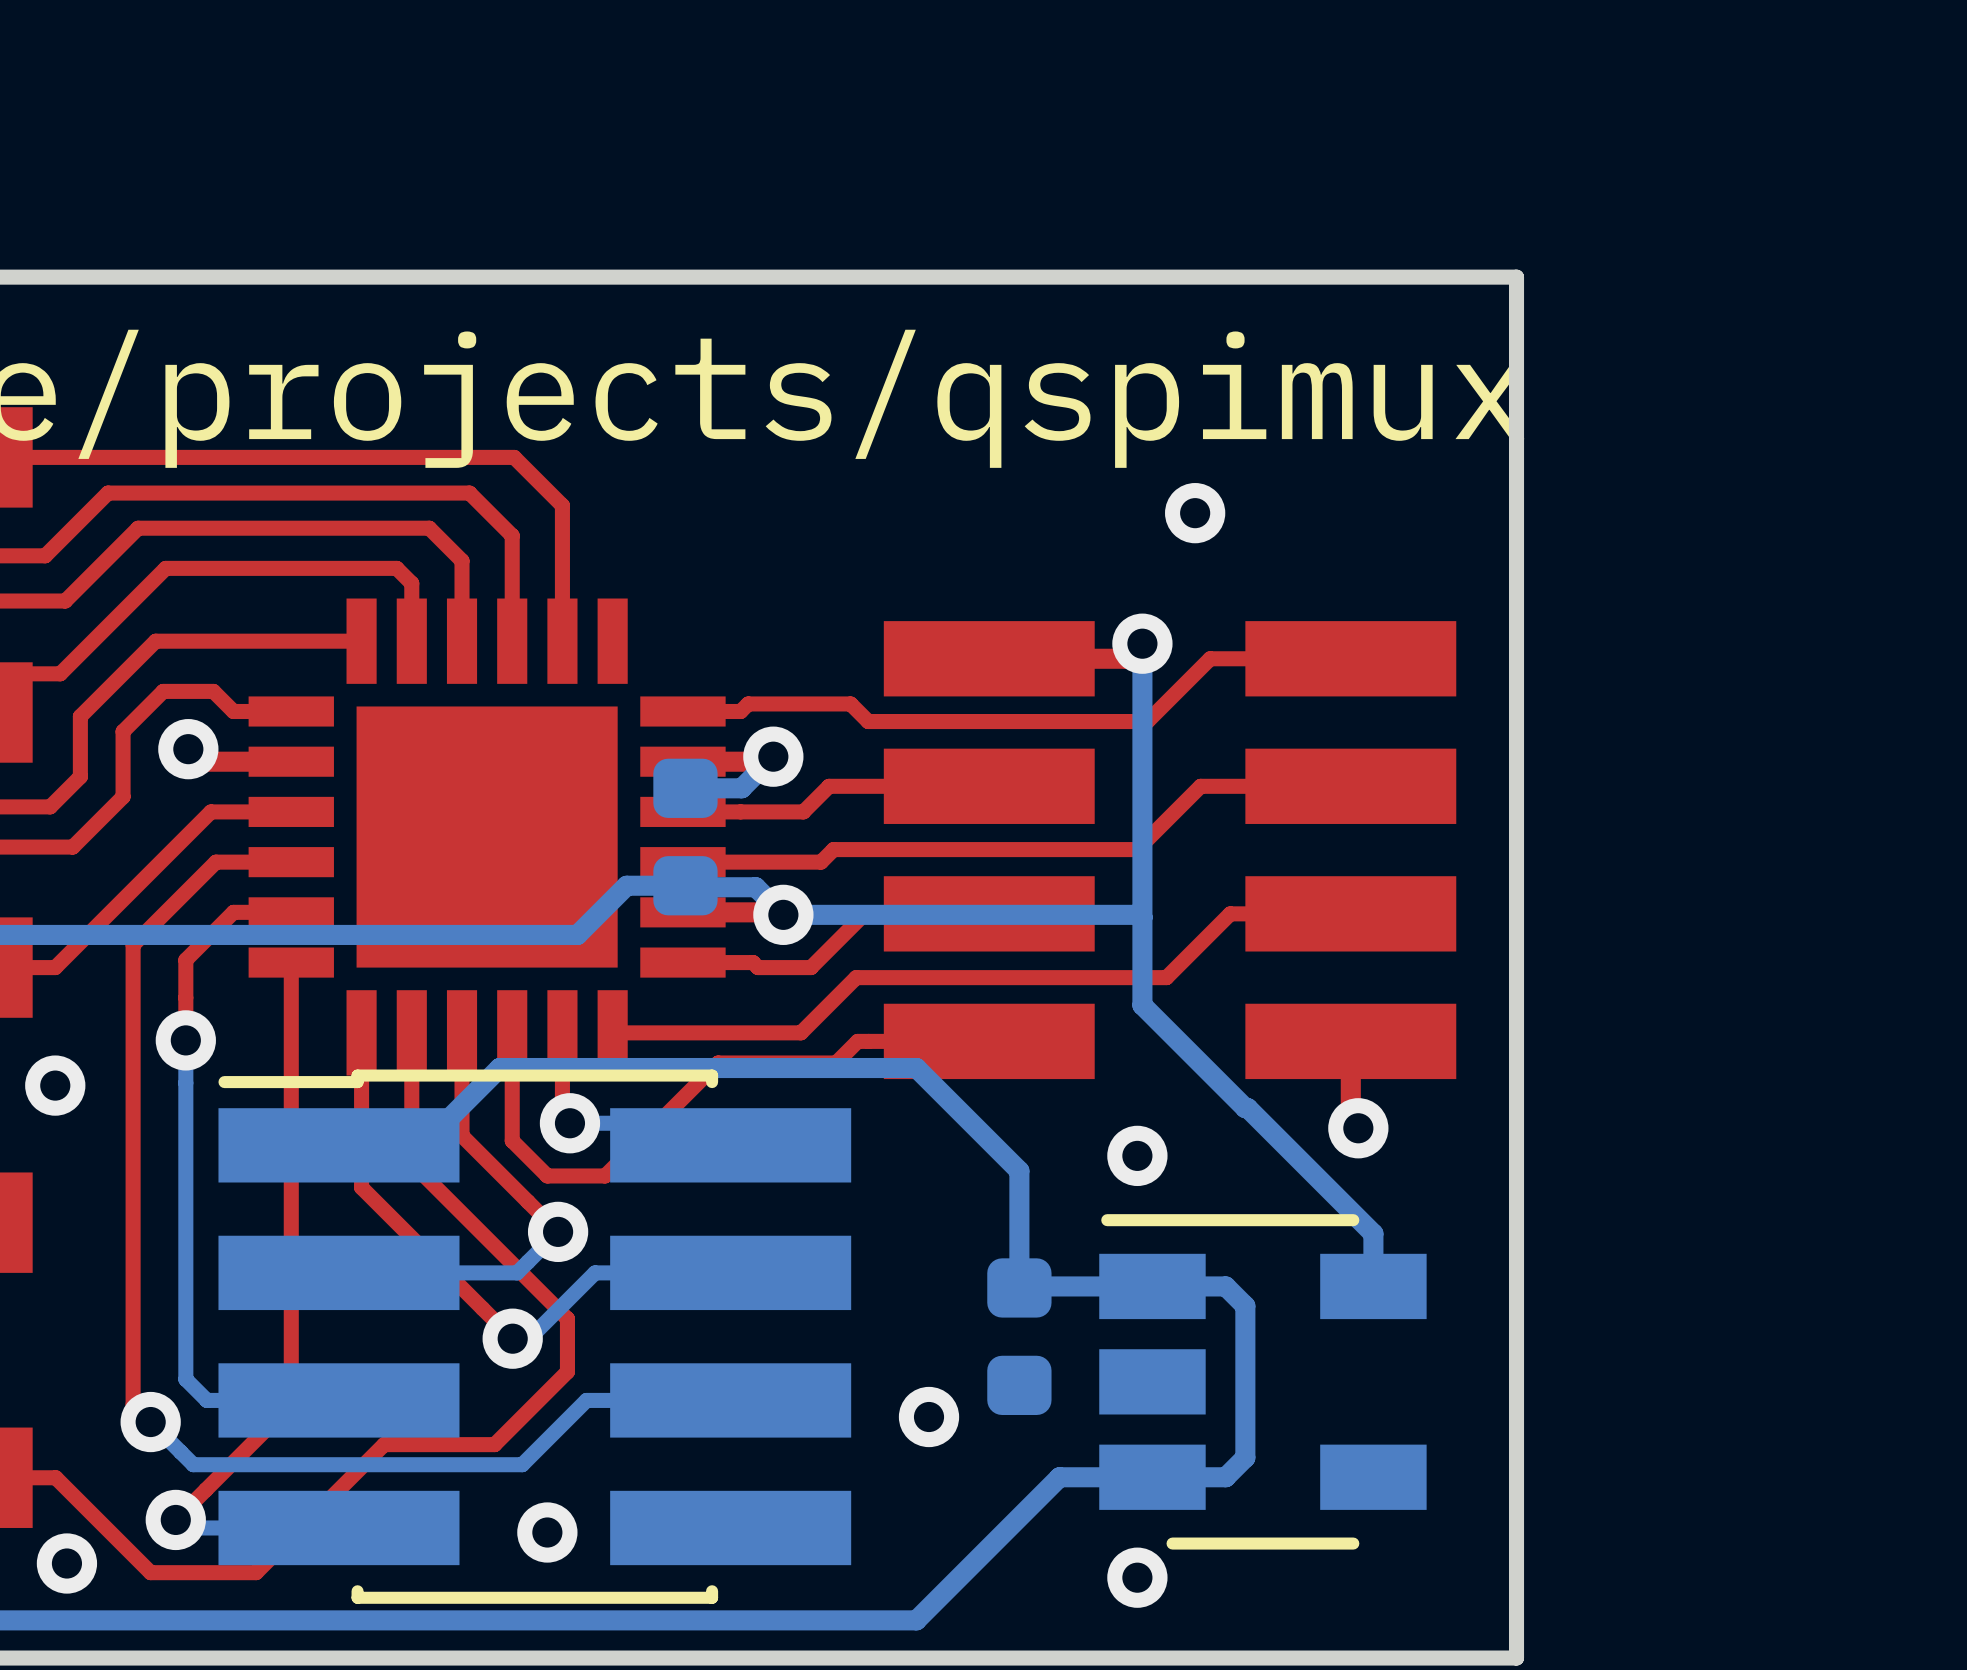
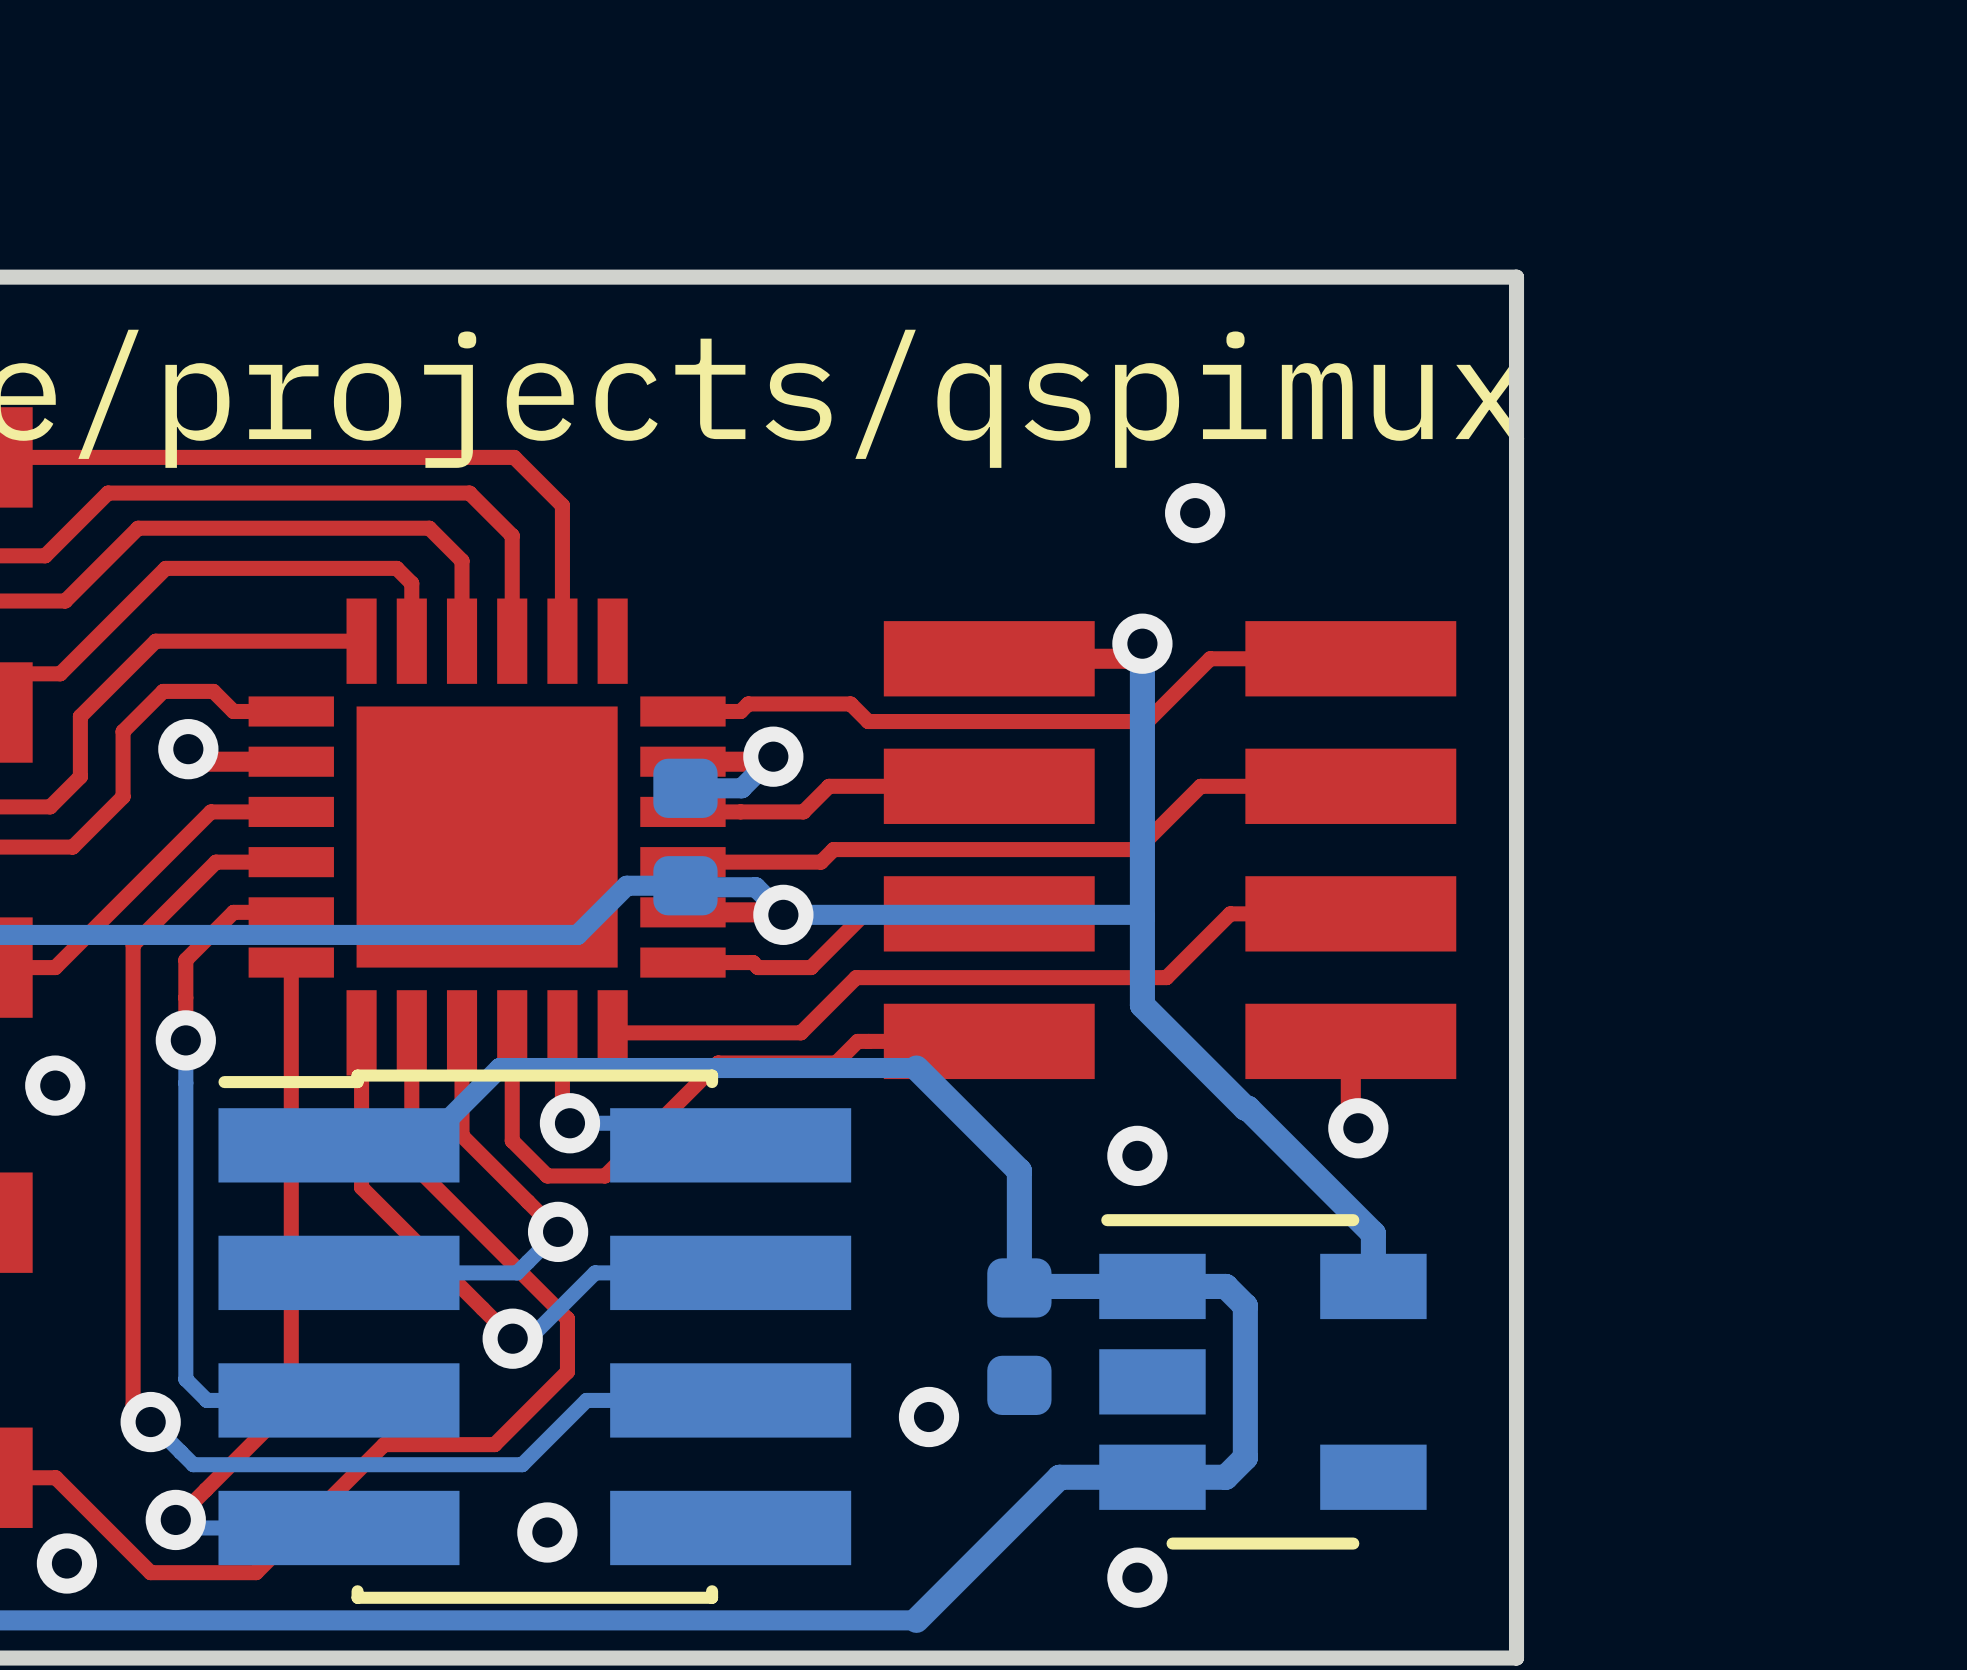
bottom track width: thin (1142, 643) (1142, 1005) (1373, 1233) (1373, 1286) -> thick (1142, 643) (1142, 1005) (1373, 1233) (1373, 1286)
bottom track width: thin (916, 1068) (1019, 1170) (1019, 1287) (1225, 1286) (1245, 1306) (1245, 1457) (1225, 1477) (1059, 1477) (916, 1620) -> thick (916, 1068) (1019, 1170) (1019, 1287) (1225, 1286) (1245, 1306) (1245, 1457) (1225, 1477) (1059, 1477) (916, 1620)

